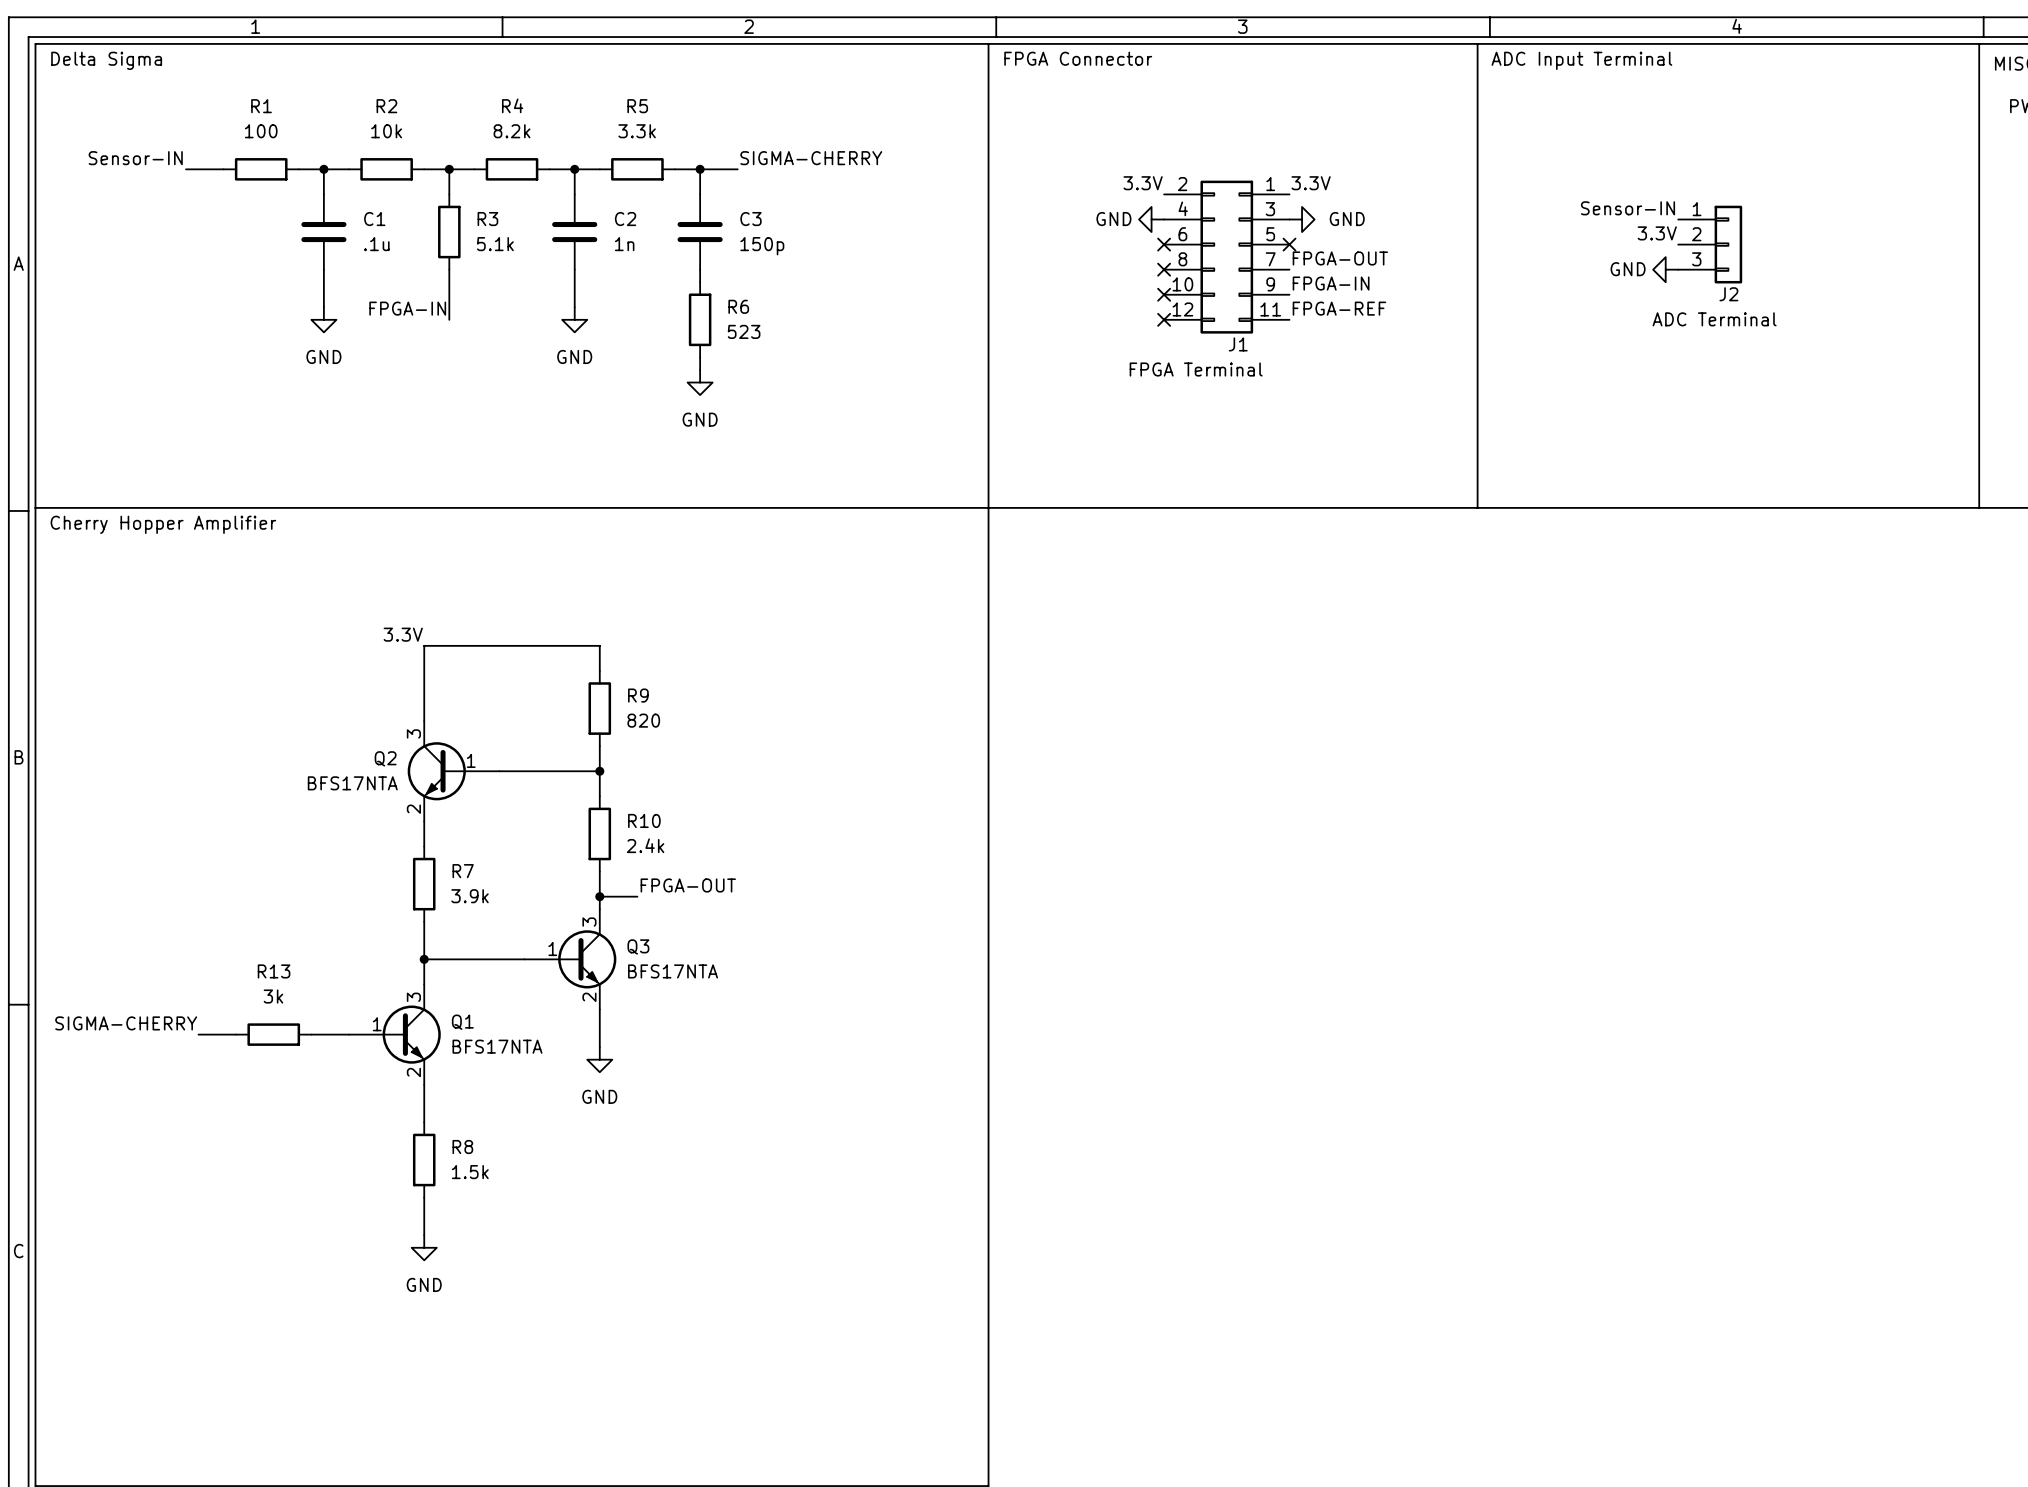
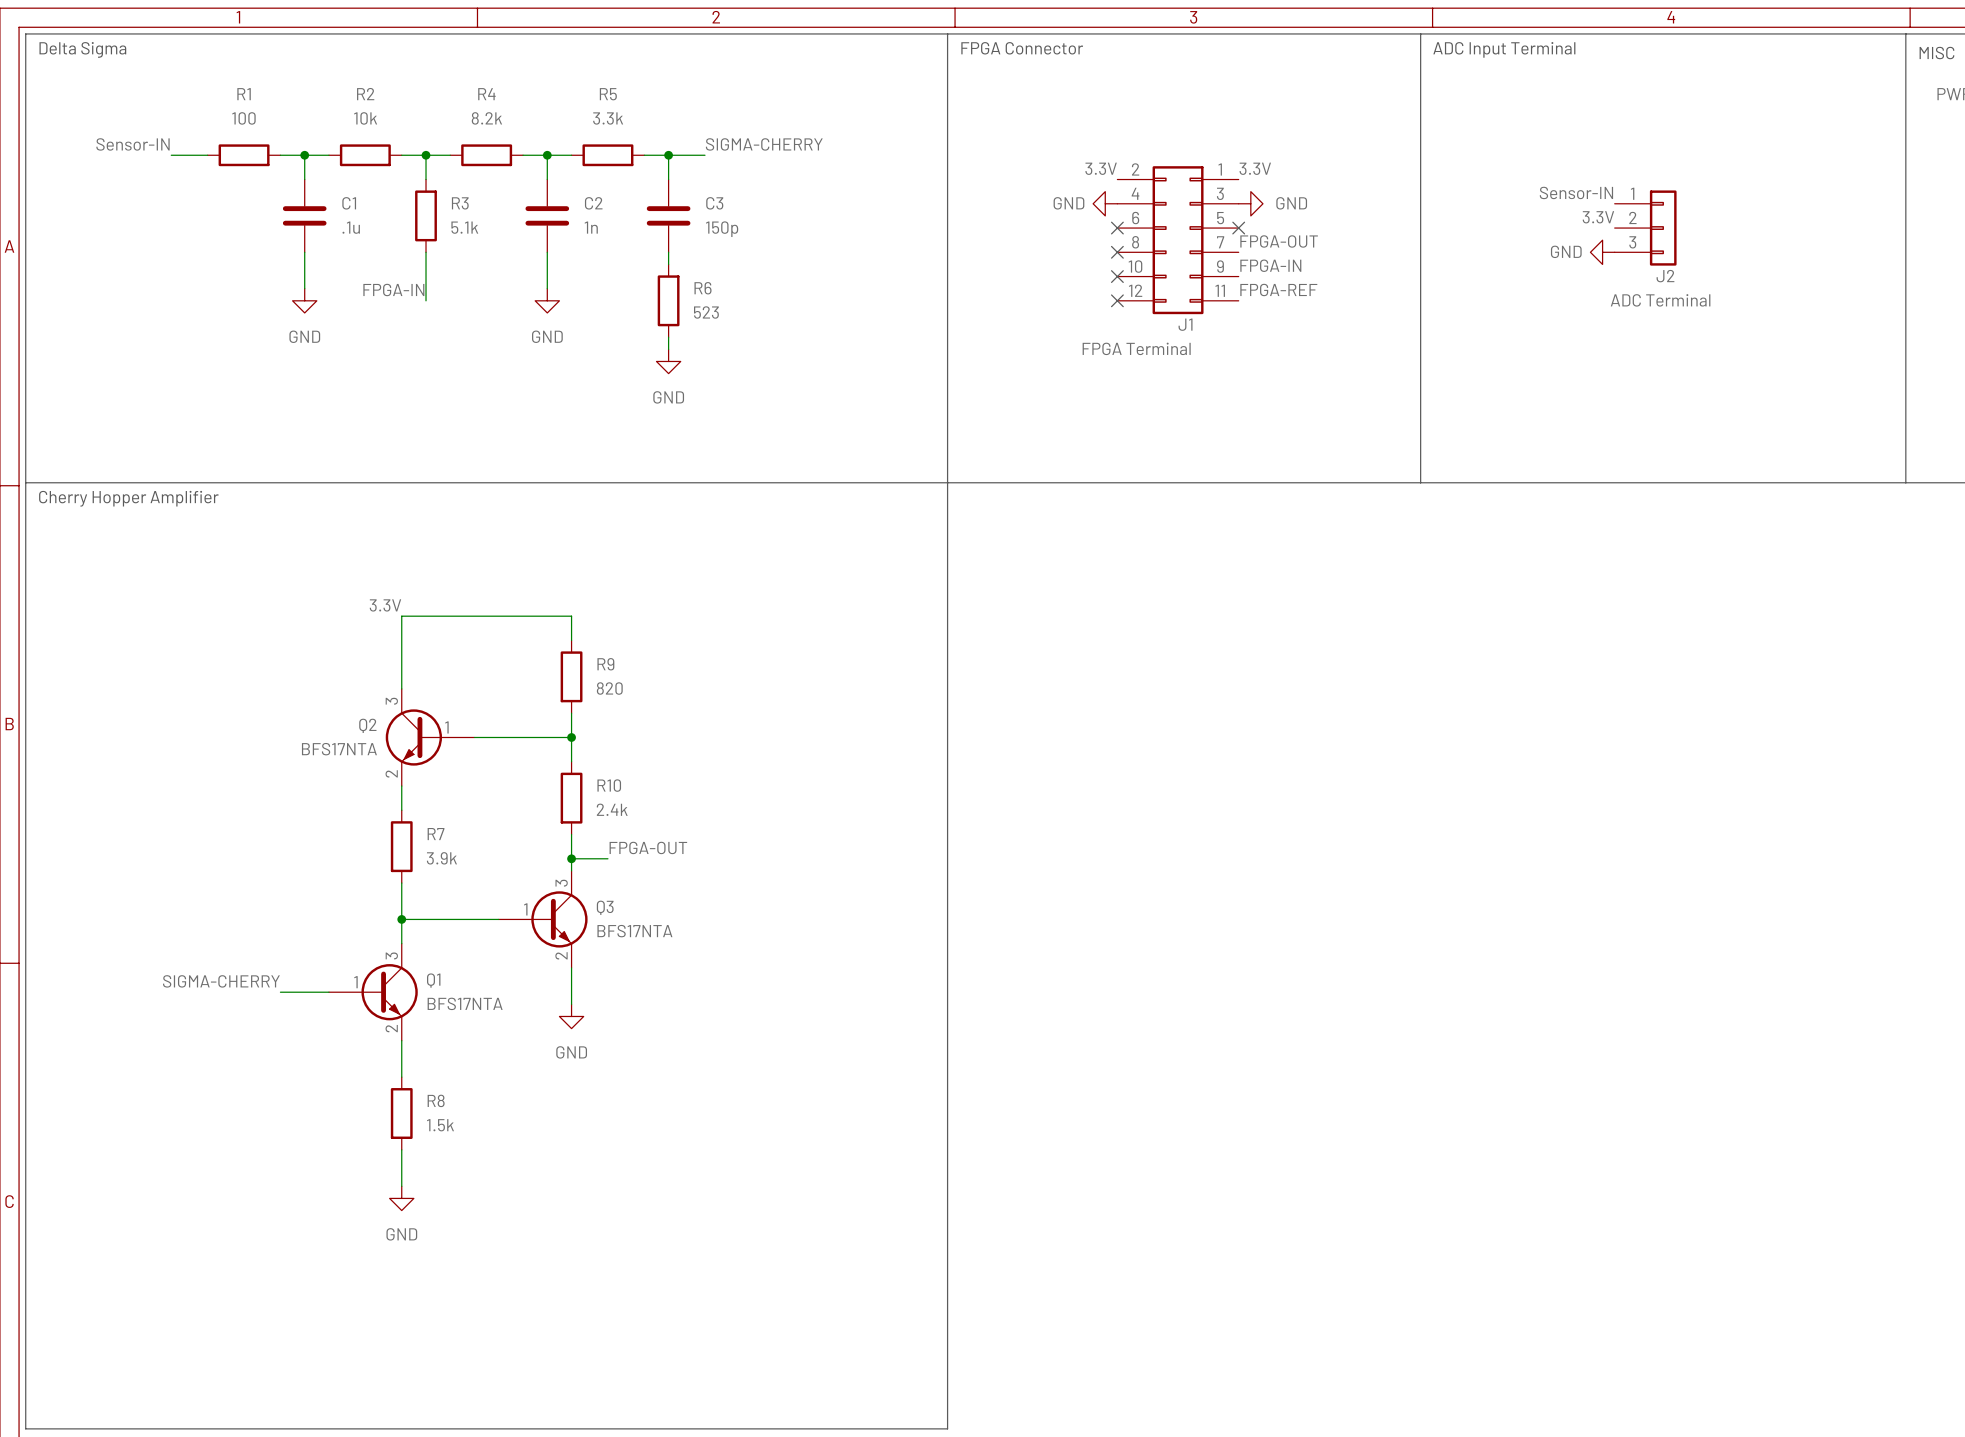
label position: SIGMA-CHERRY (126, 1023) -> SIGMA-CHERRY (221, 981)
wire: (198, 1034) (236, 1034) -> none
R13: 3k (273, 1034) -> none

